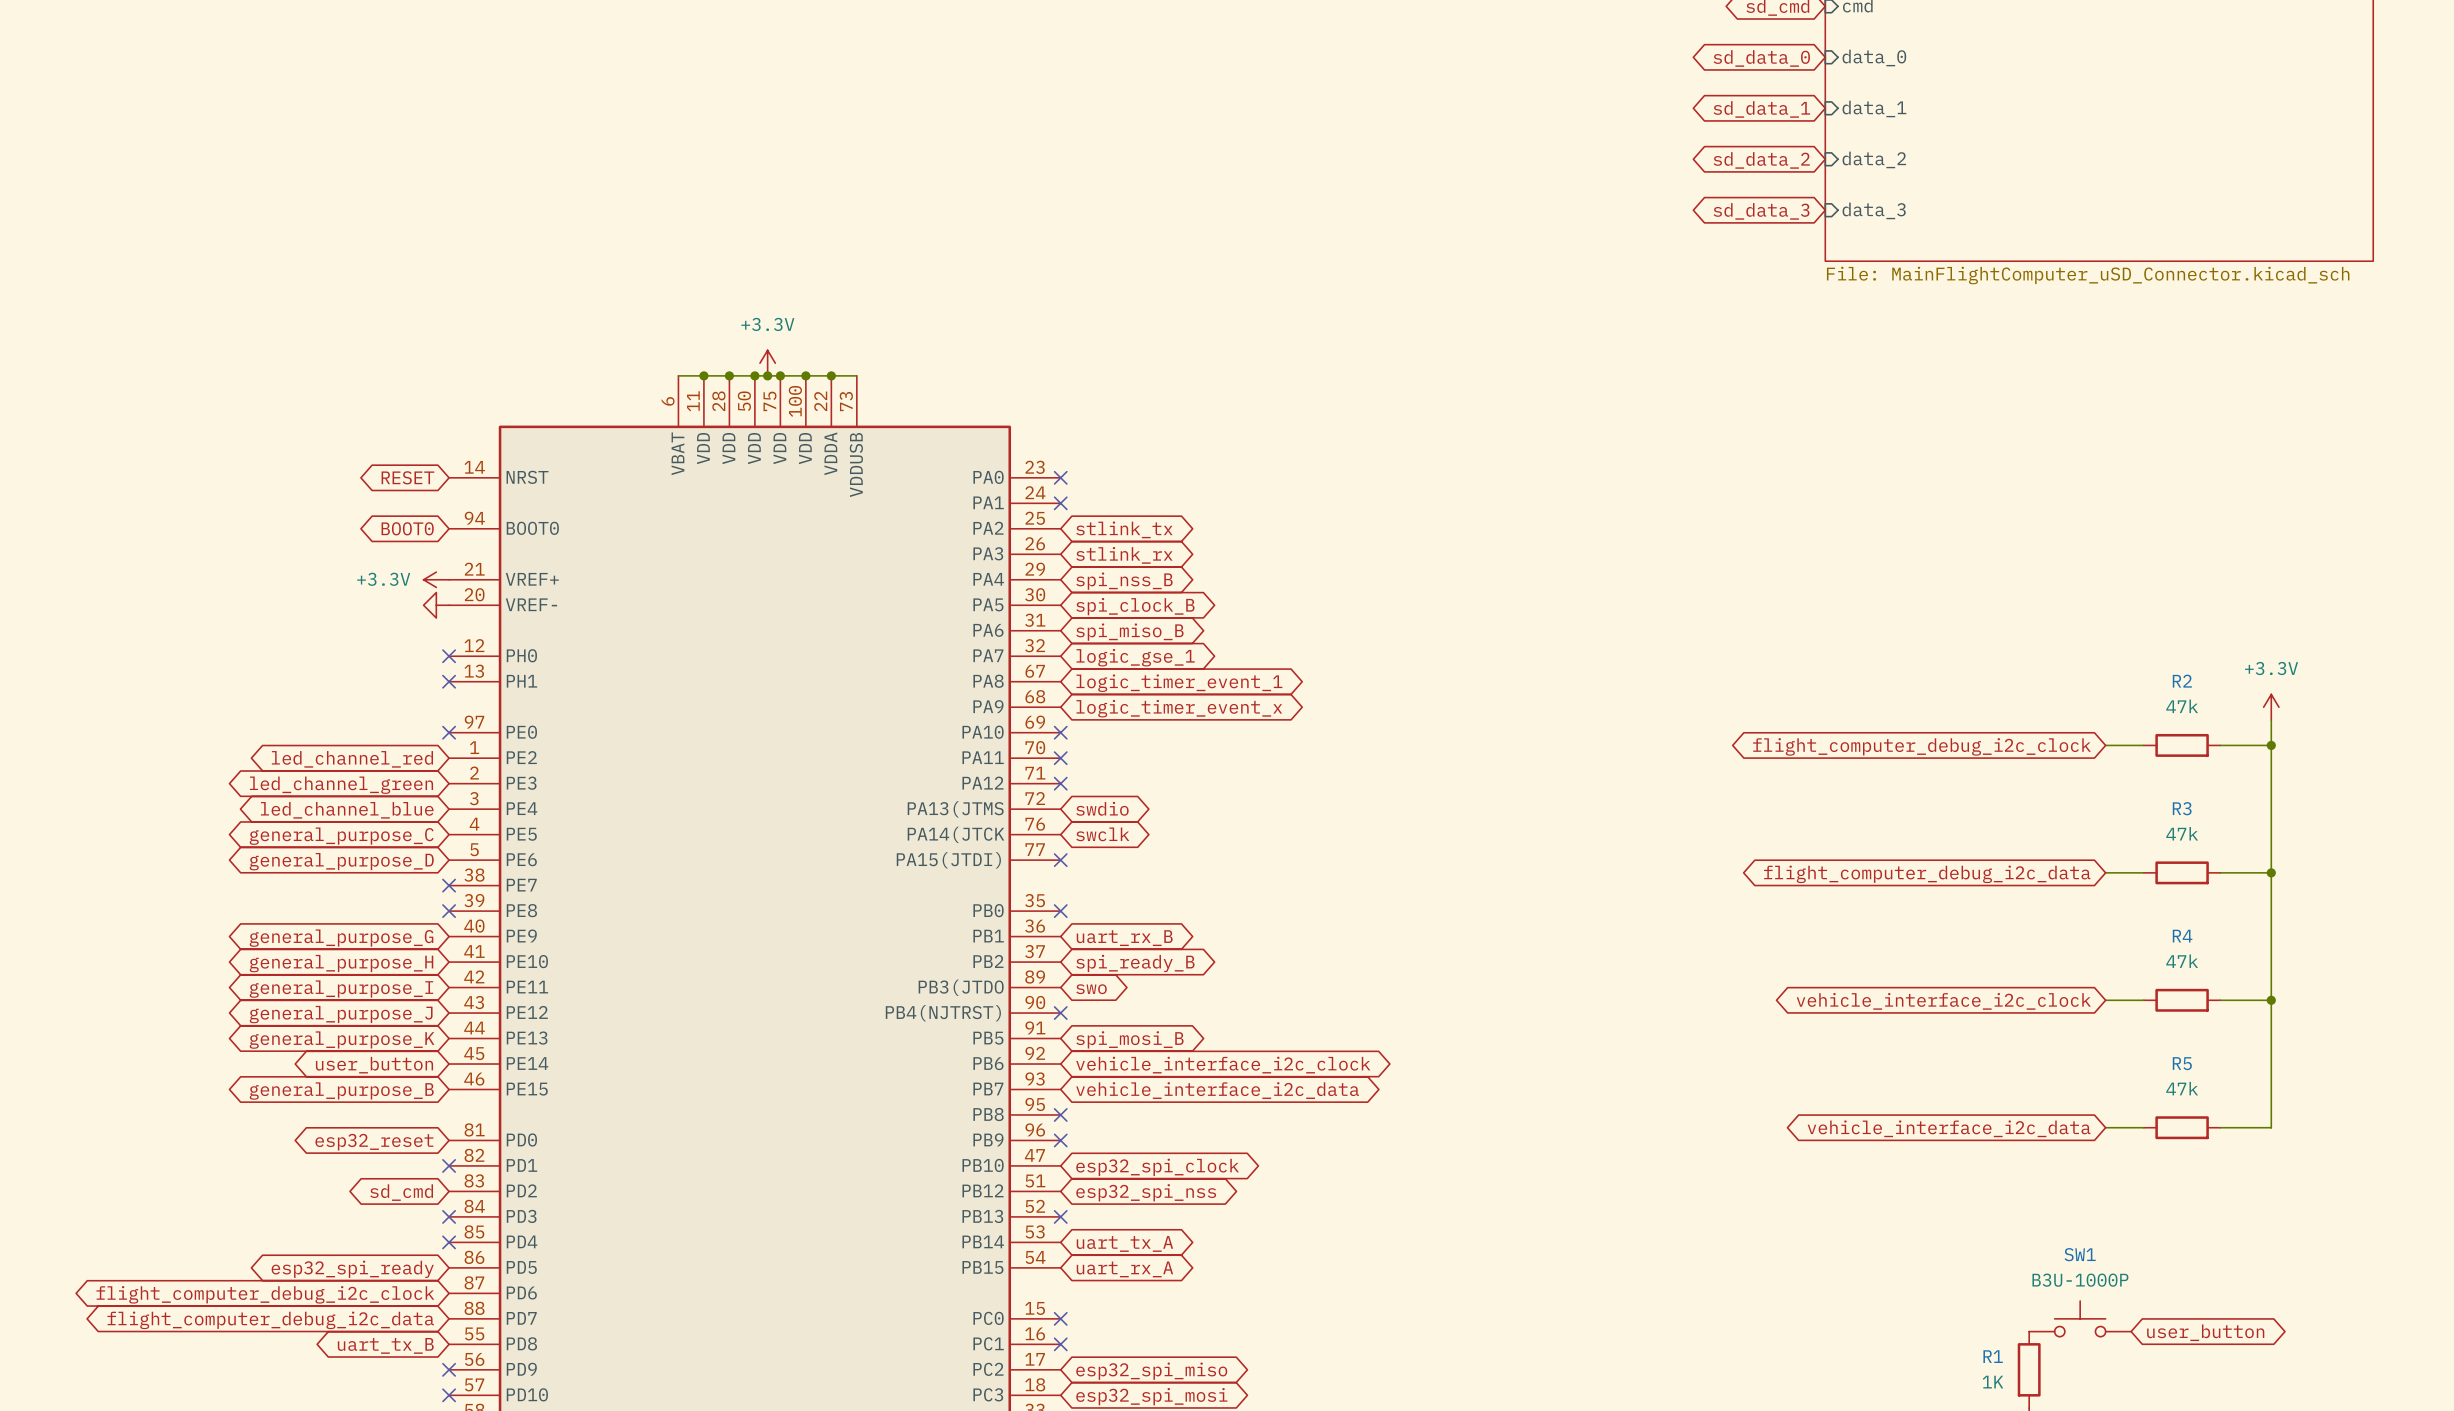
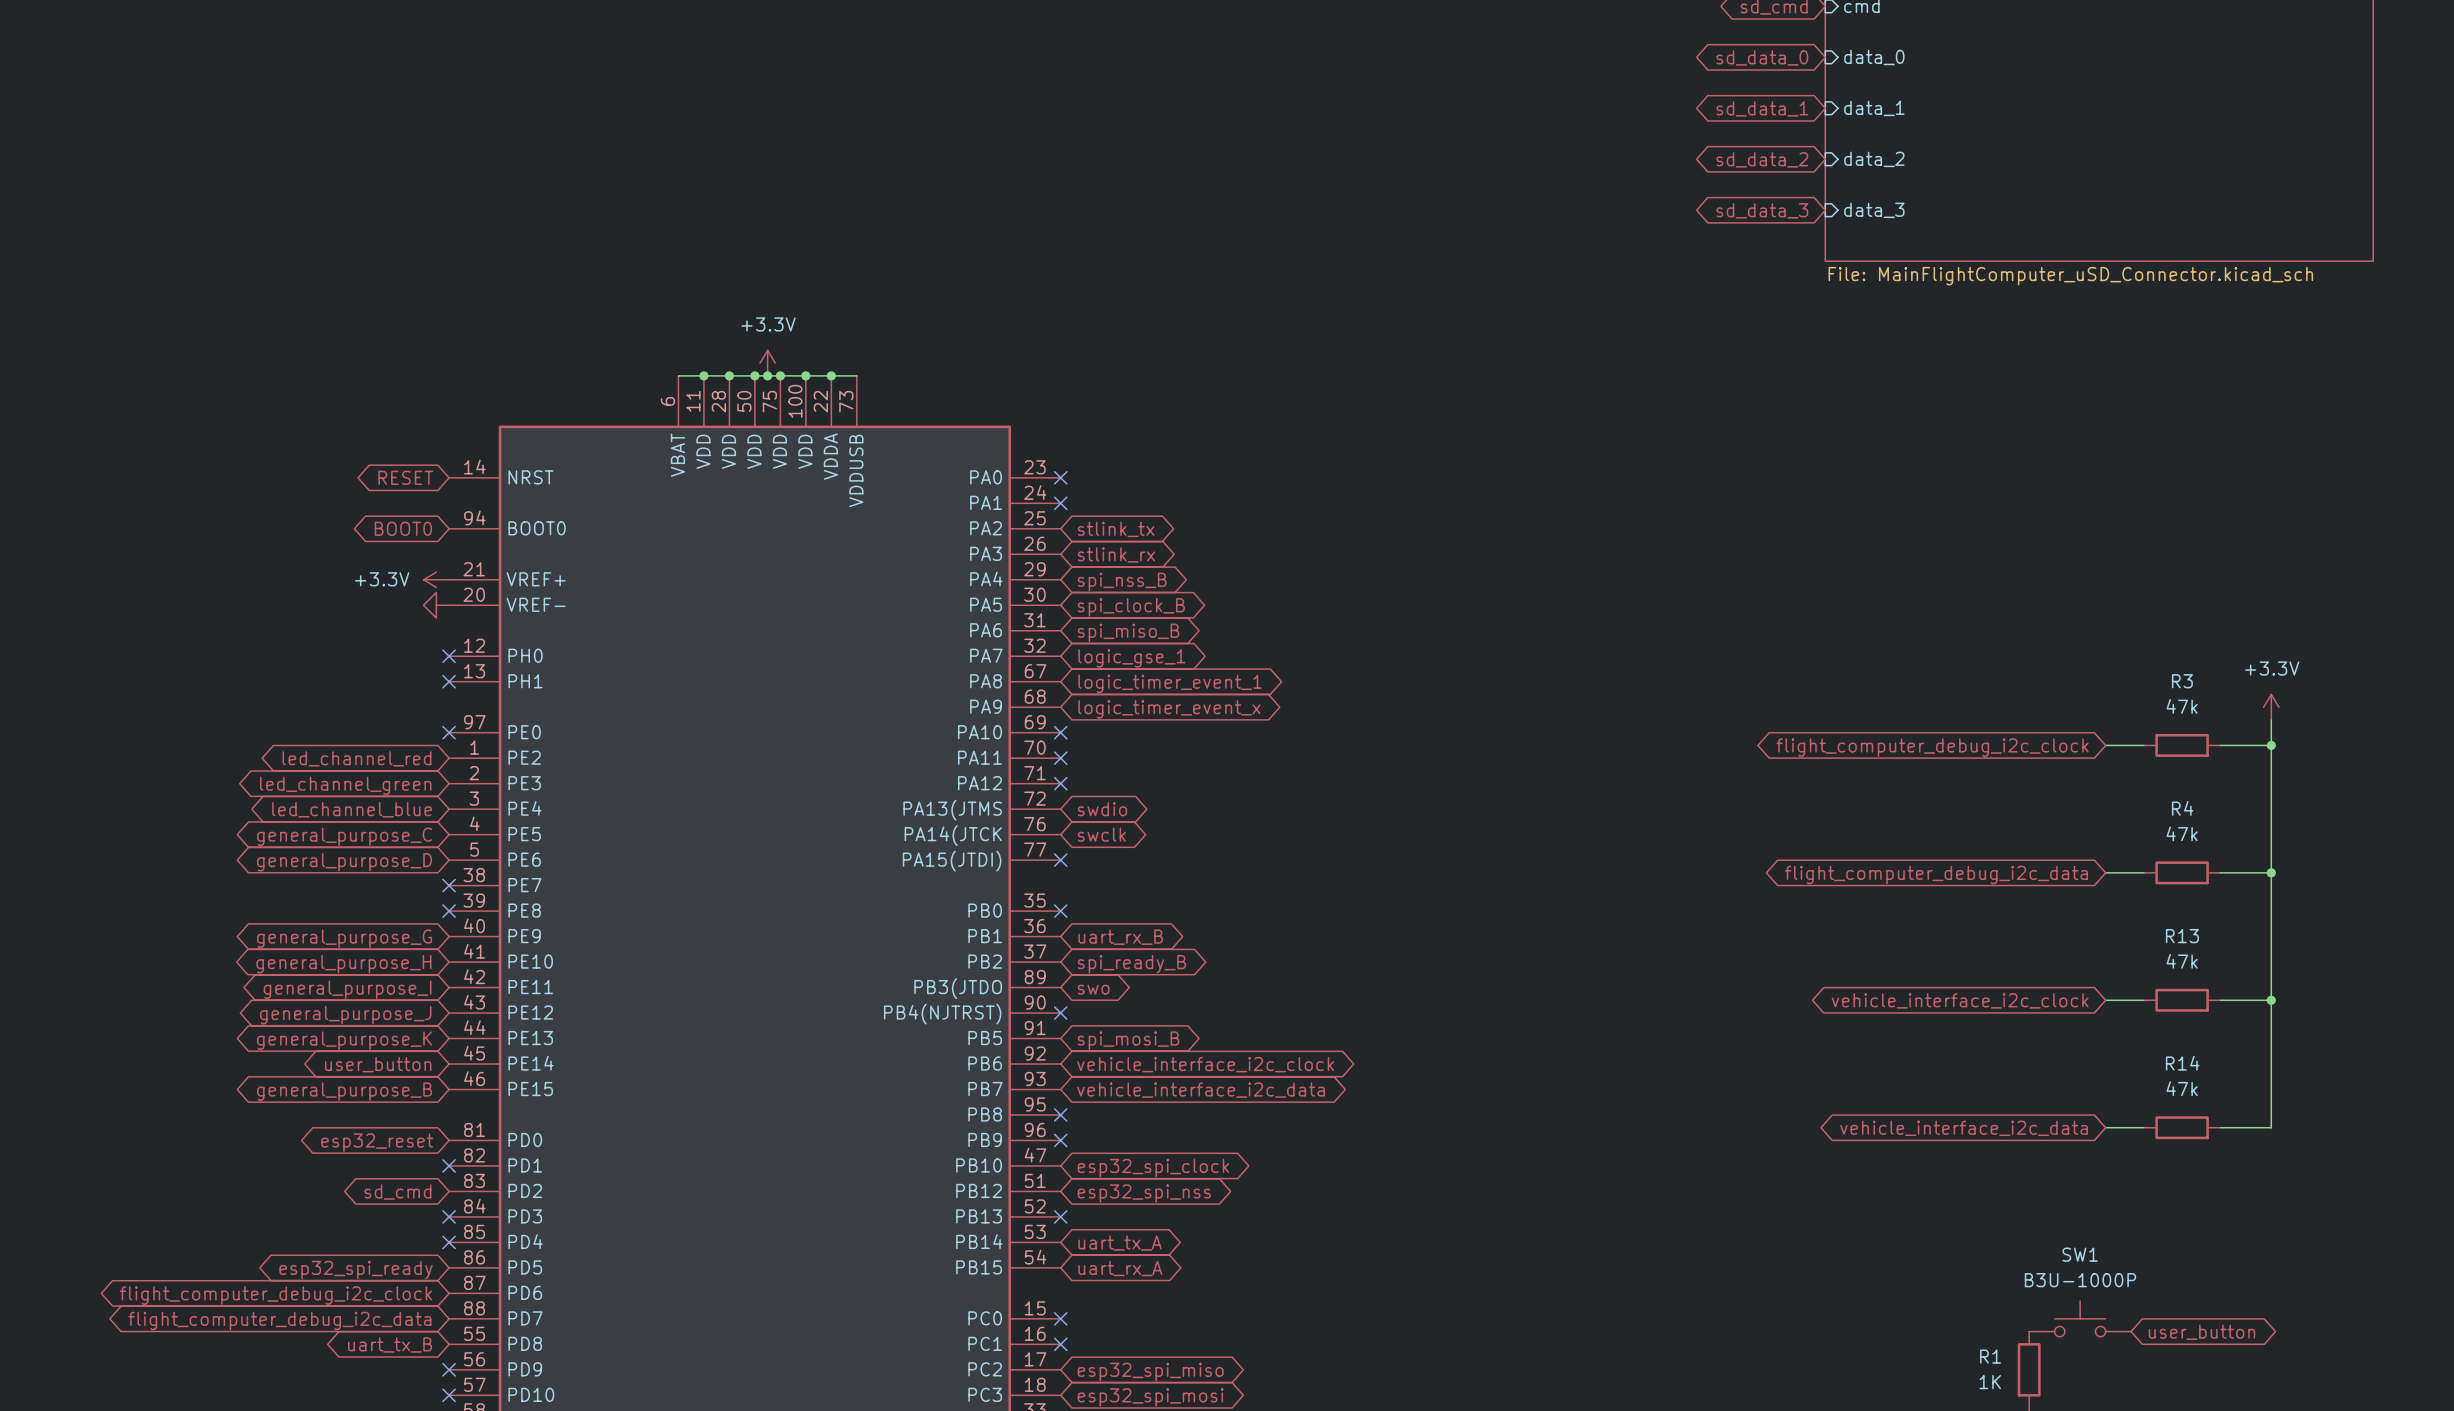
R2 name: R2 (2182, 681) -> R3 (2182, 681)
R3 name: R3 (2182, 808) -> R4 (2182, 808)
R4 name: R4 (2182, 936) -> R13 (2182, 936)
R5 name: R5 (2182, 1063) -> R14 (2182, 1063)

